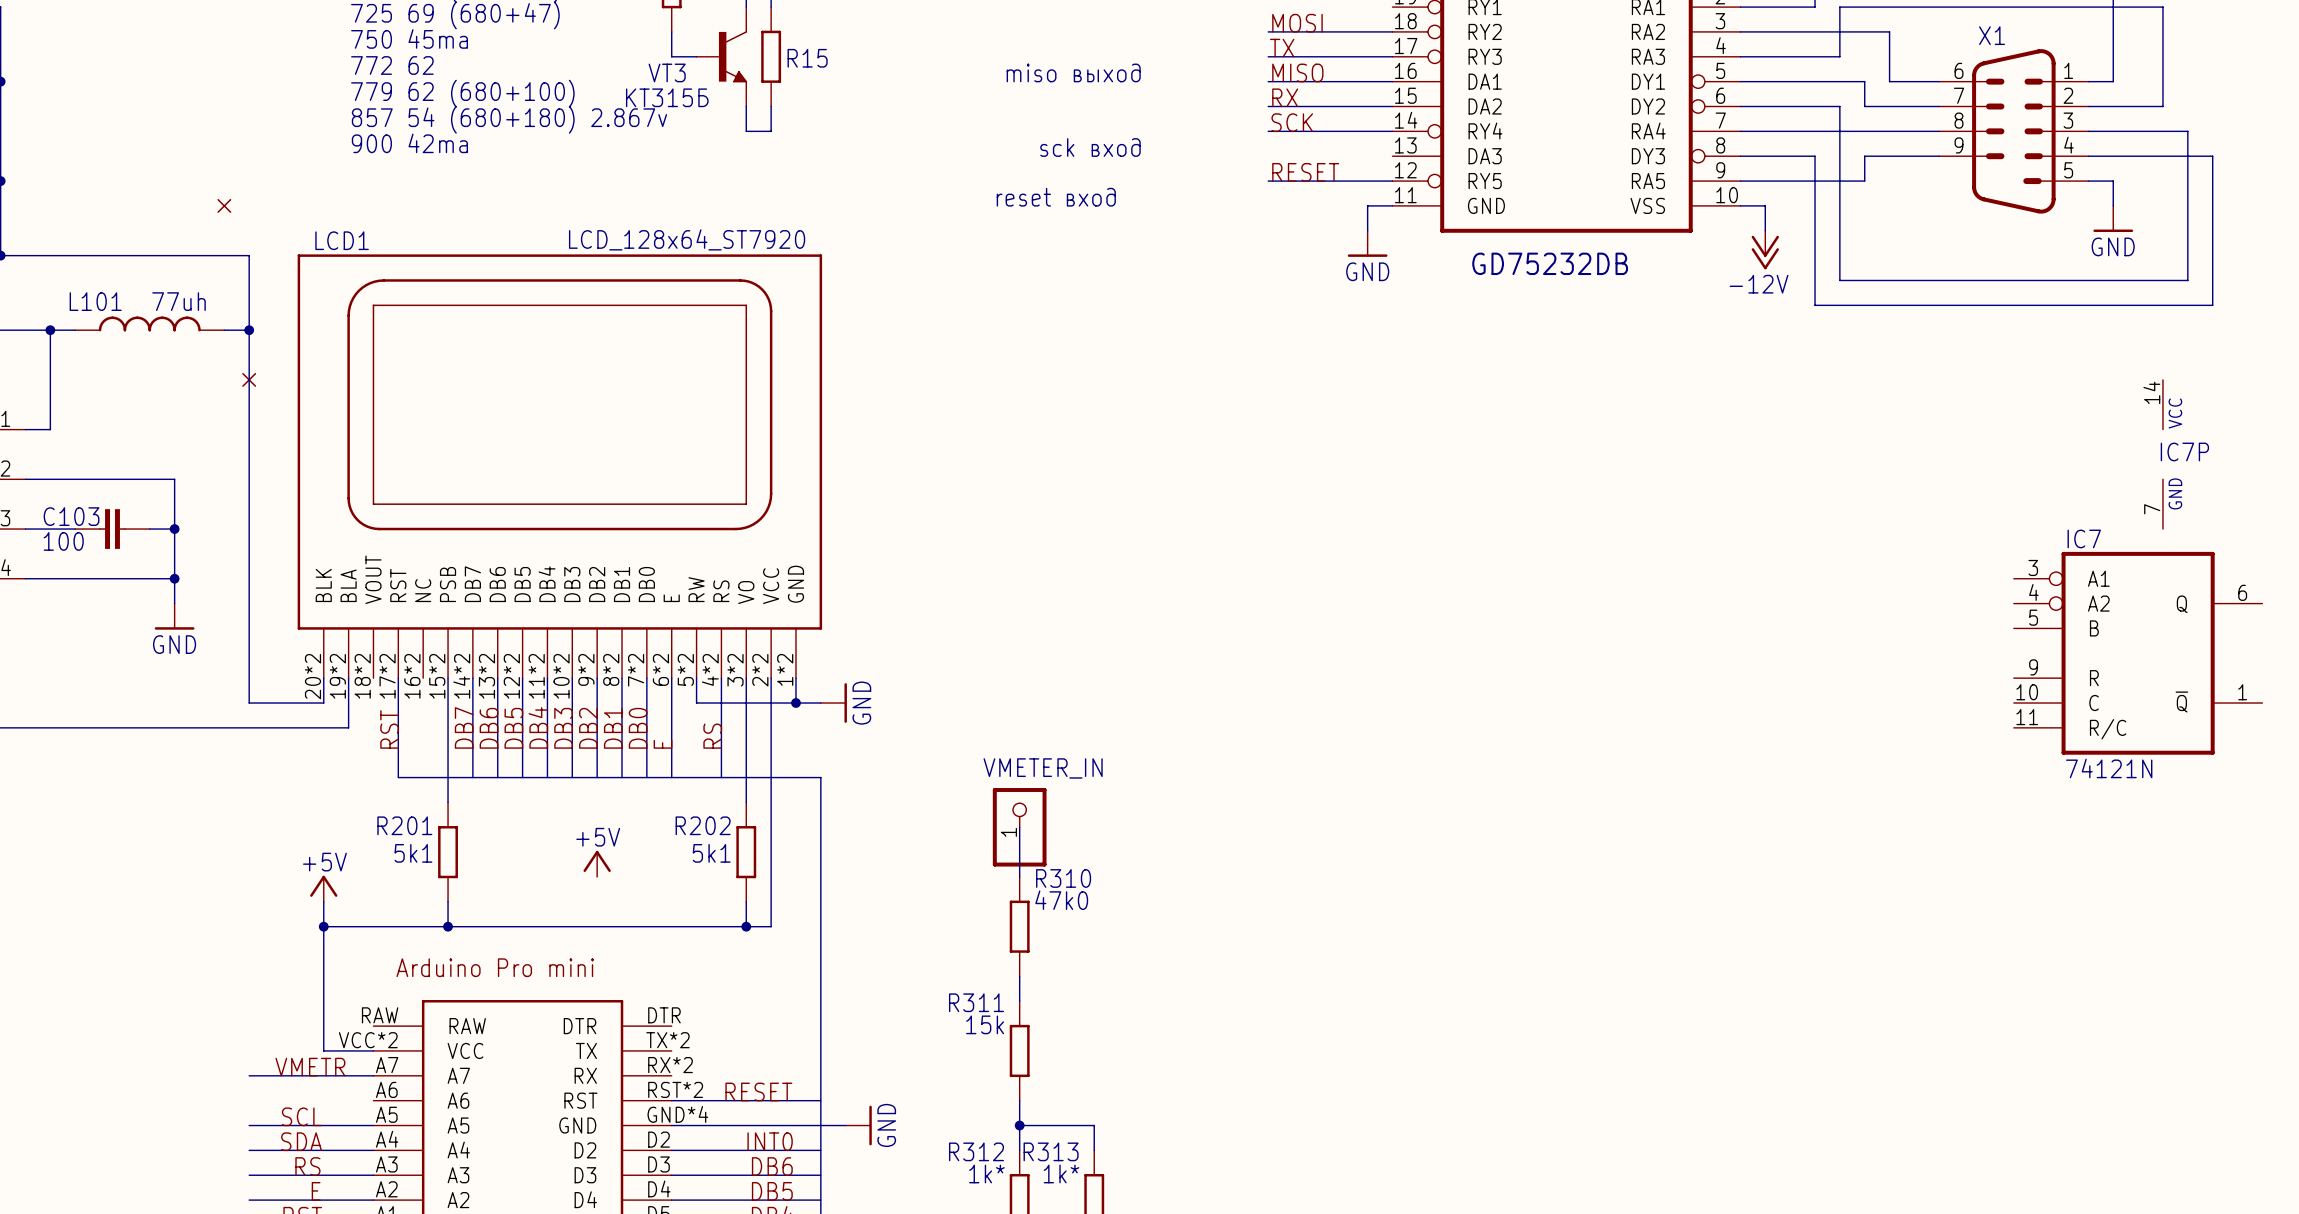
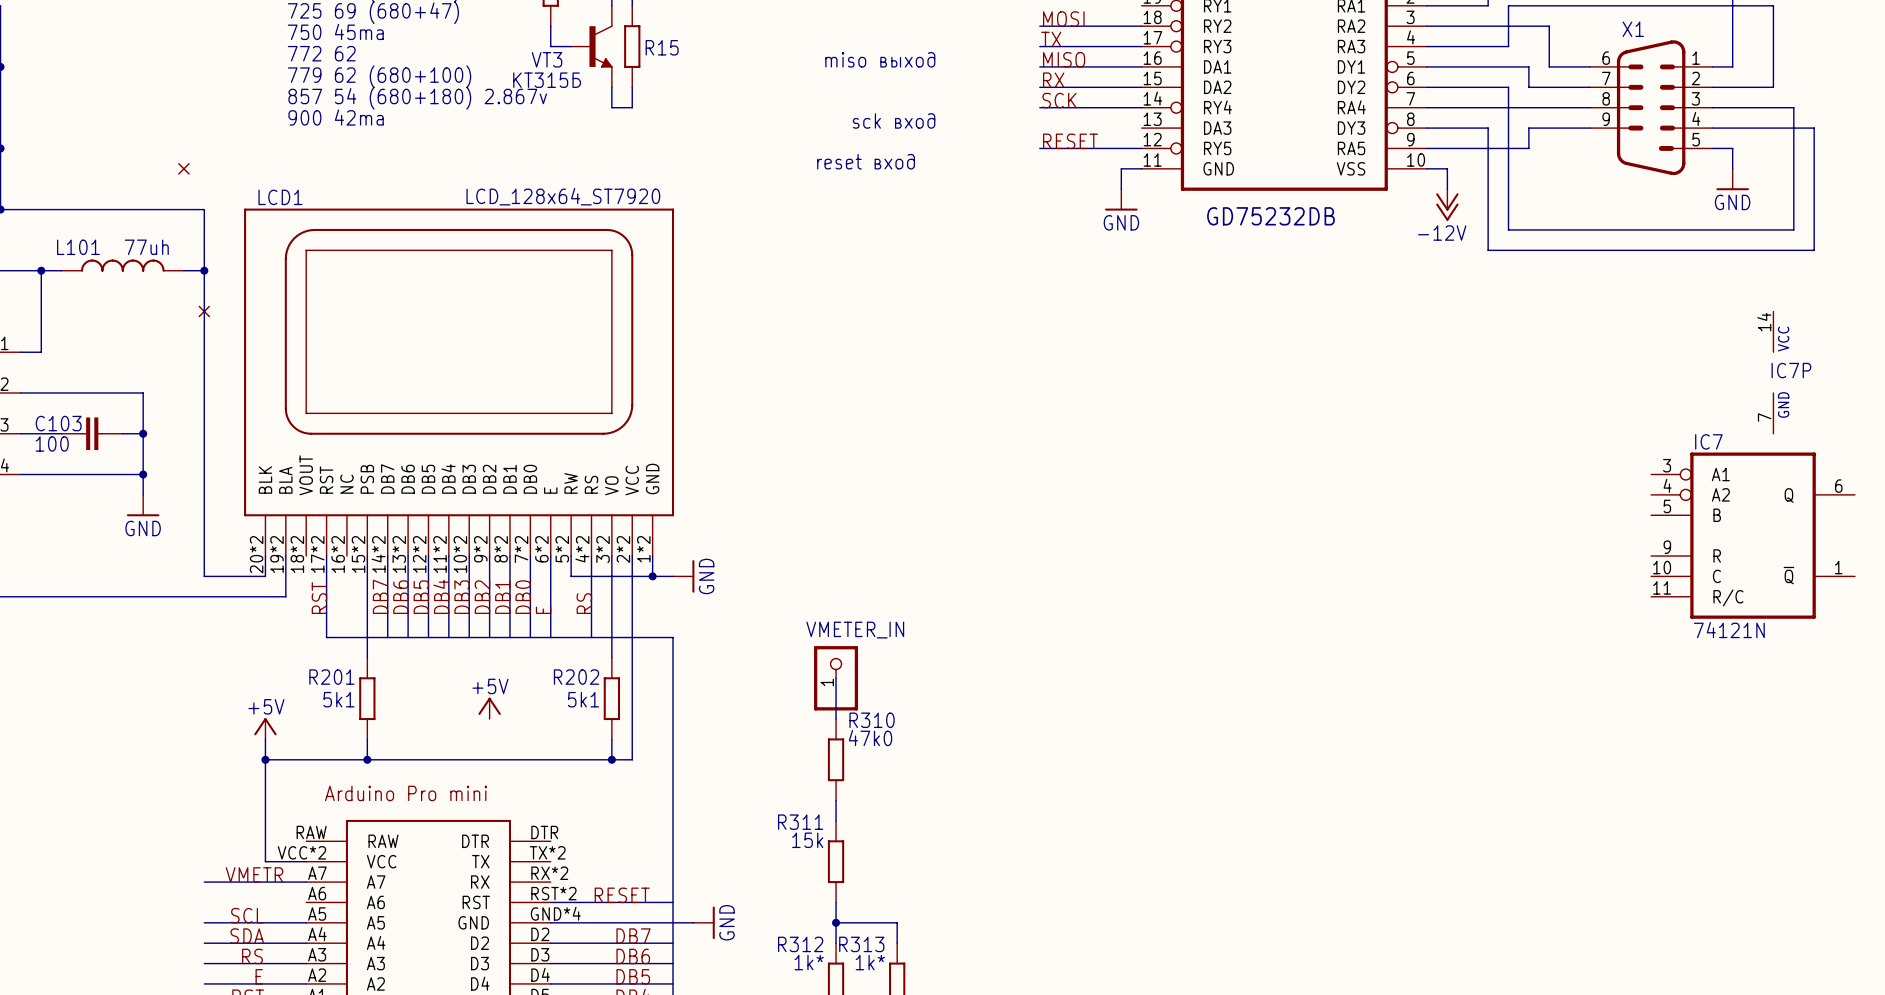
label: INT0 (770, 1141) -> DB7 (633, 936)

